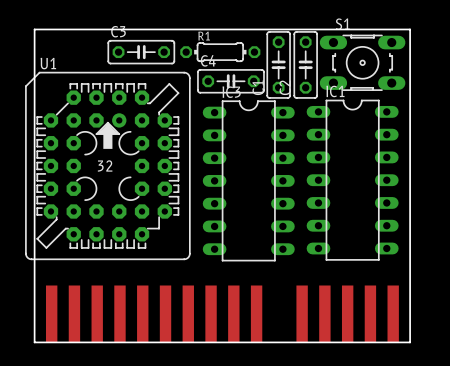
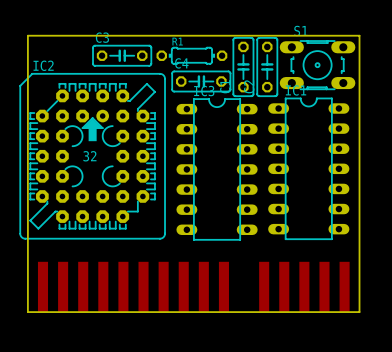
U1 name: U1 (48, 63) -> IC2 (43, 65)

